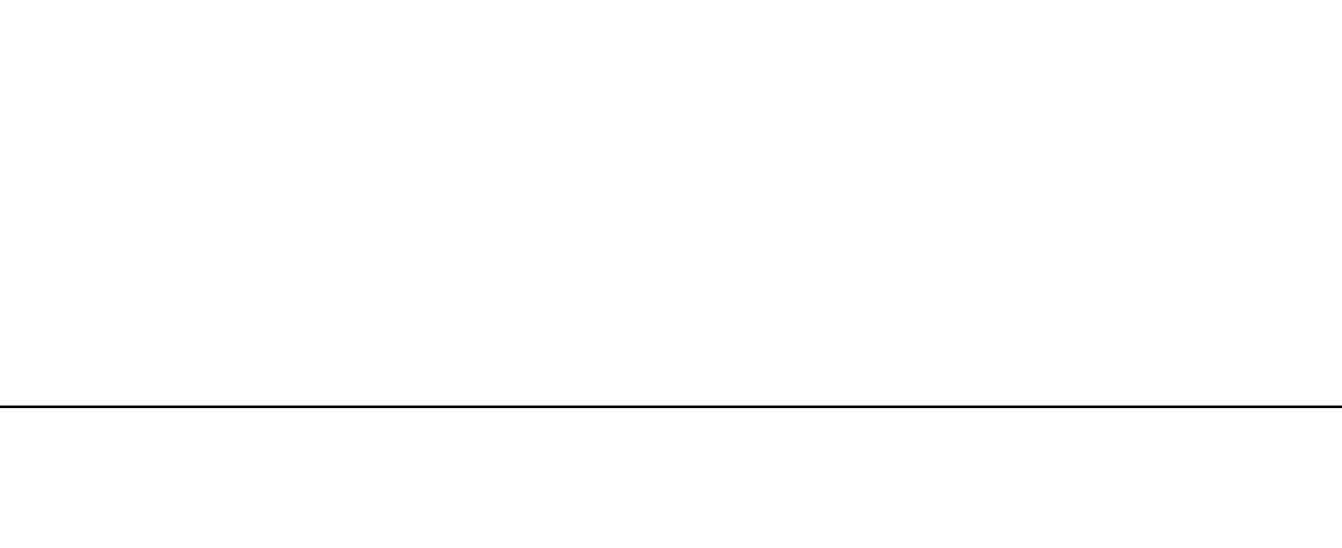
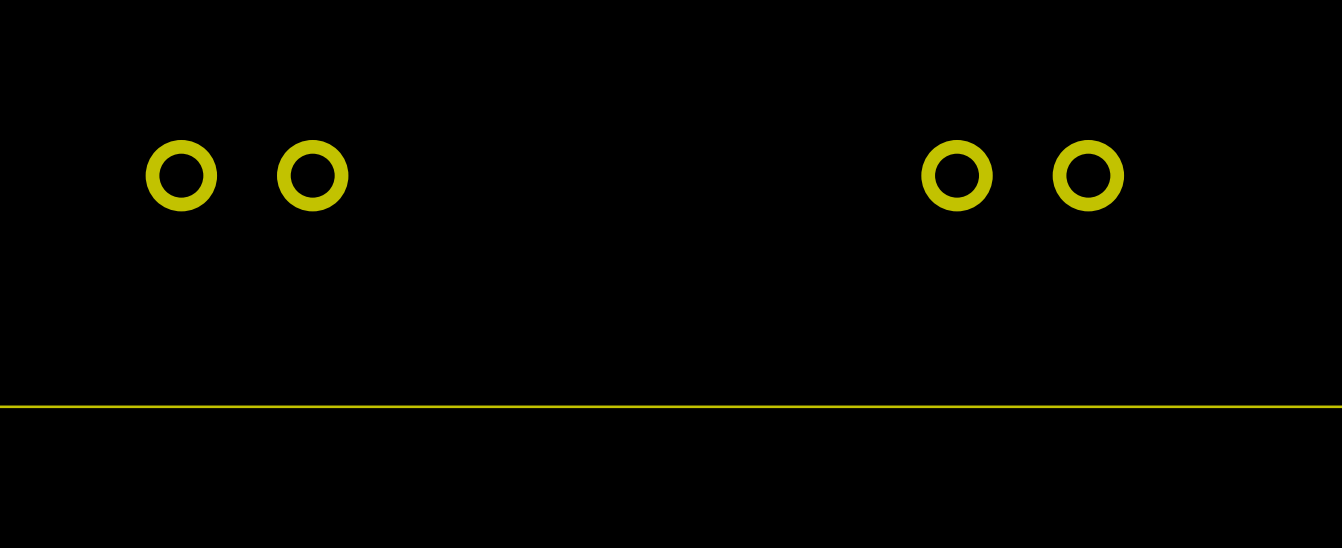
part: none -> (247, 175)
part: none -> (1022, 175)

